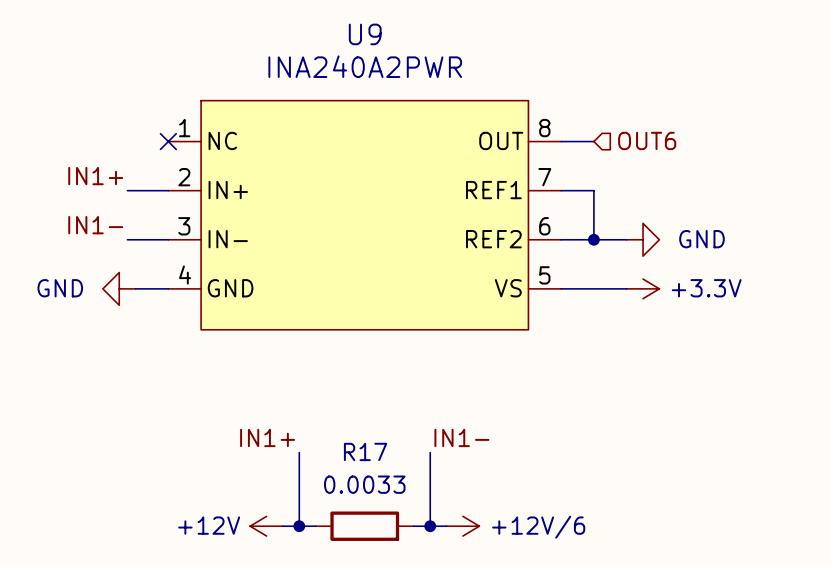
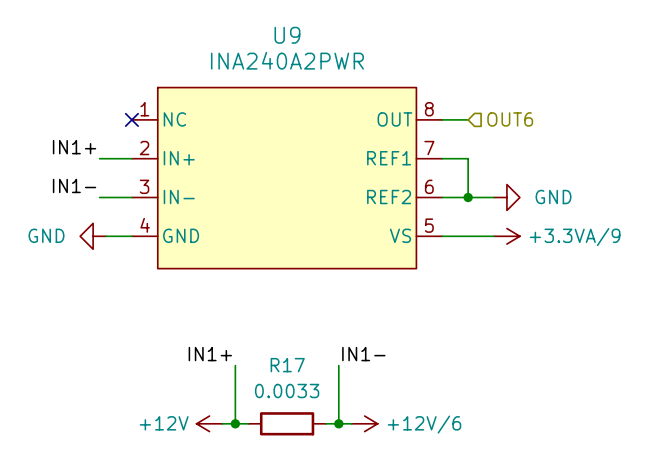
power symbol: +3.3V (643, 288) -> +3.3VA/9 (506, 236)

